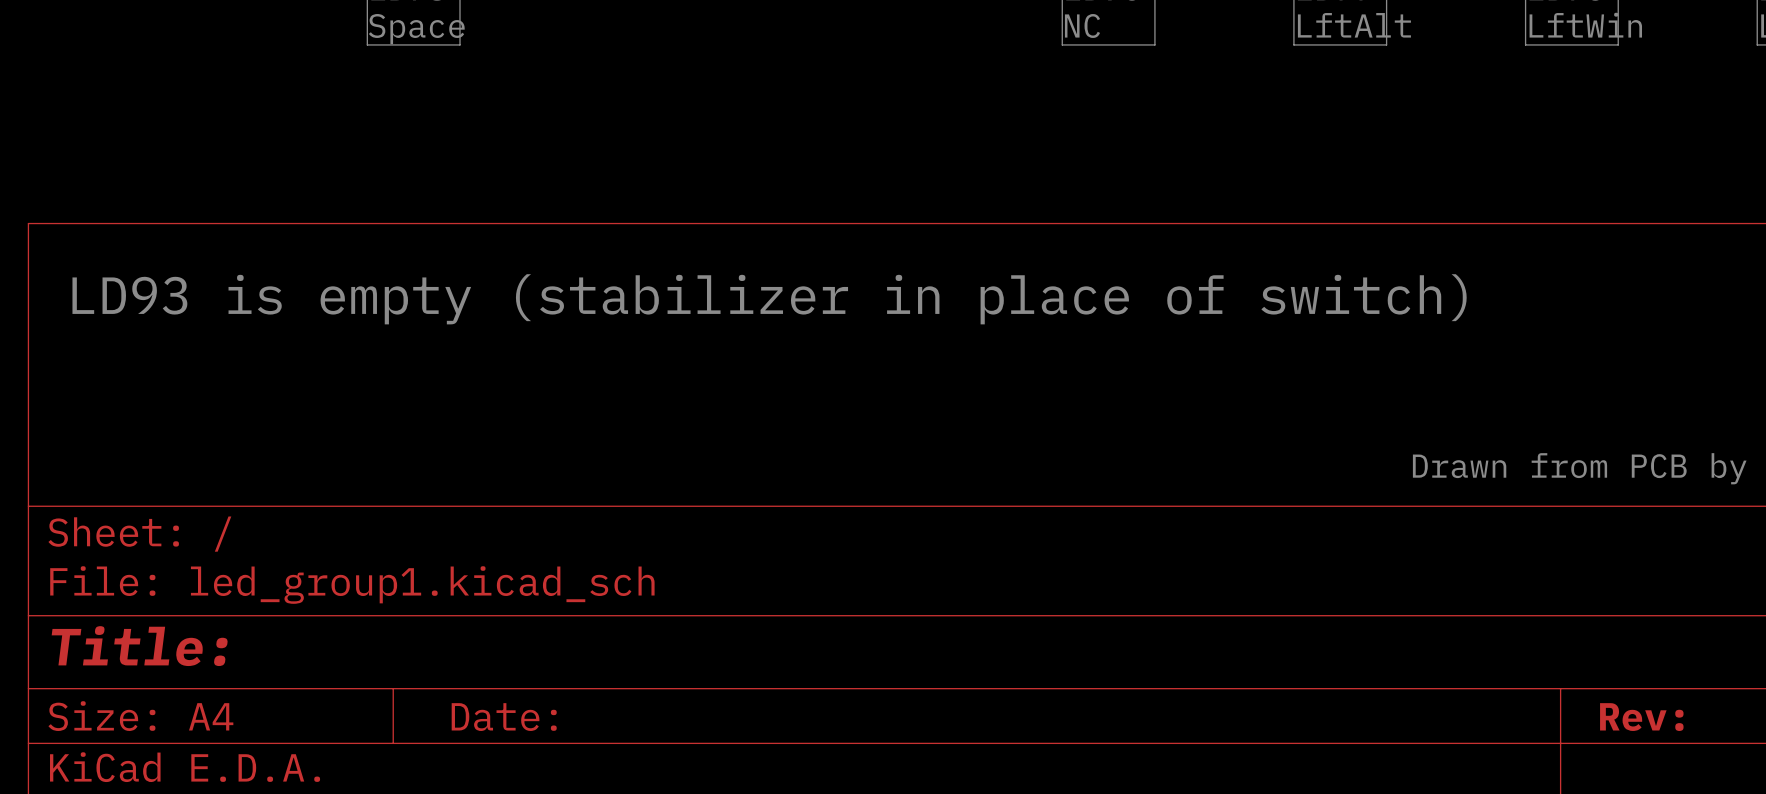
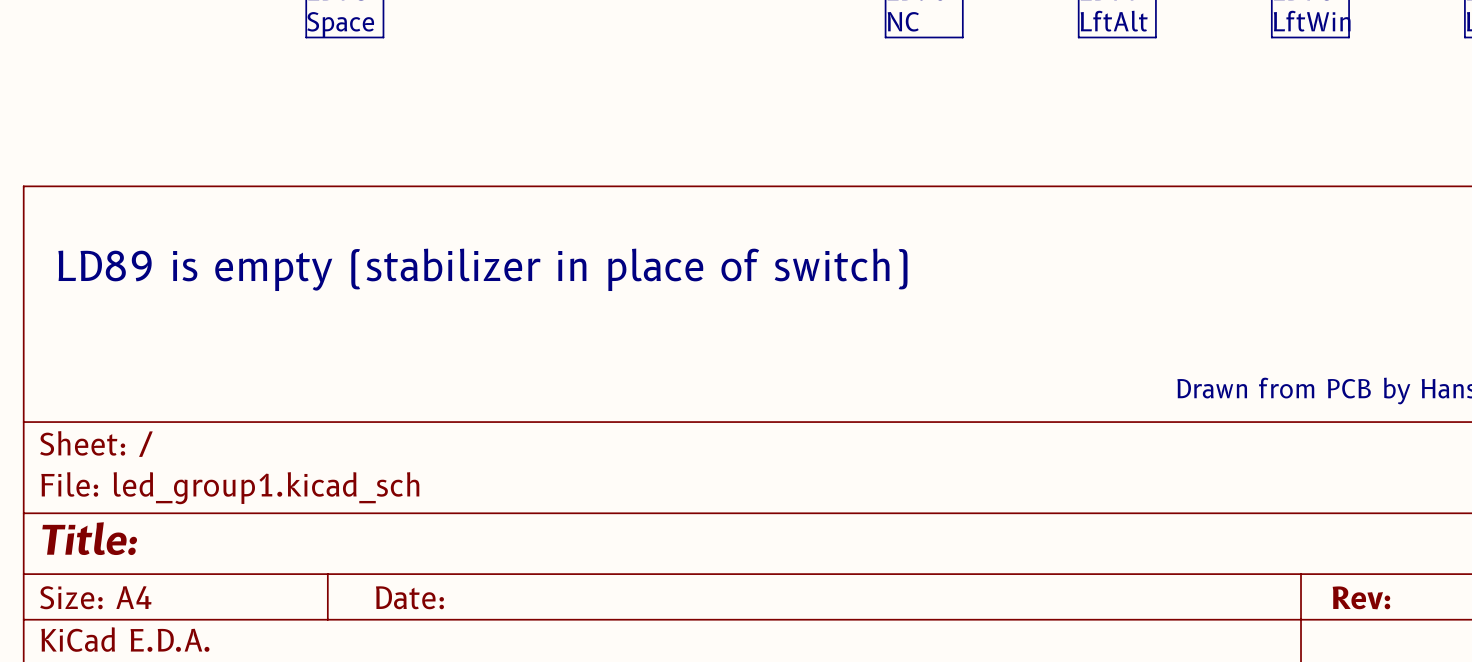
text: LD93 is empty (stabilizer in place of switch) (769, 299) -> LD89 is empty (stabilizer in place of switch) (482, 269)

